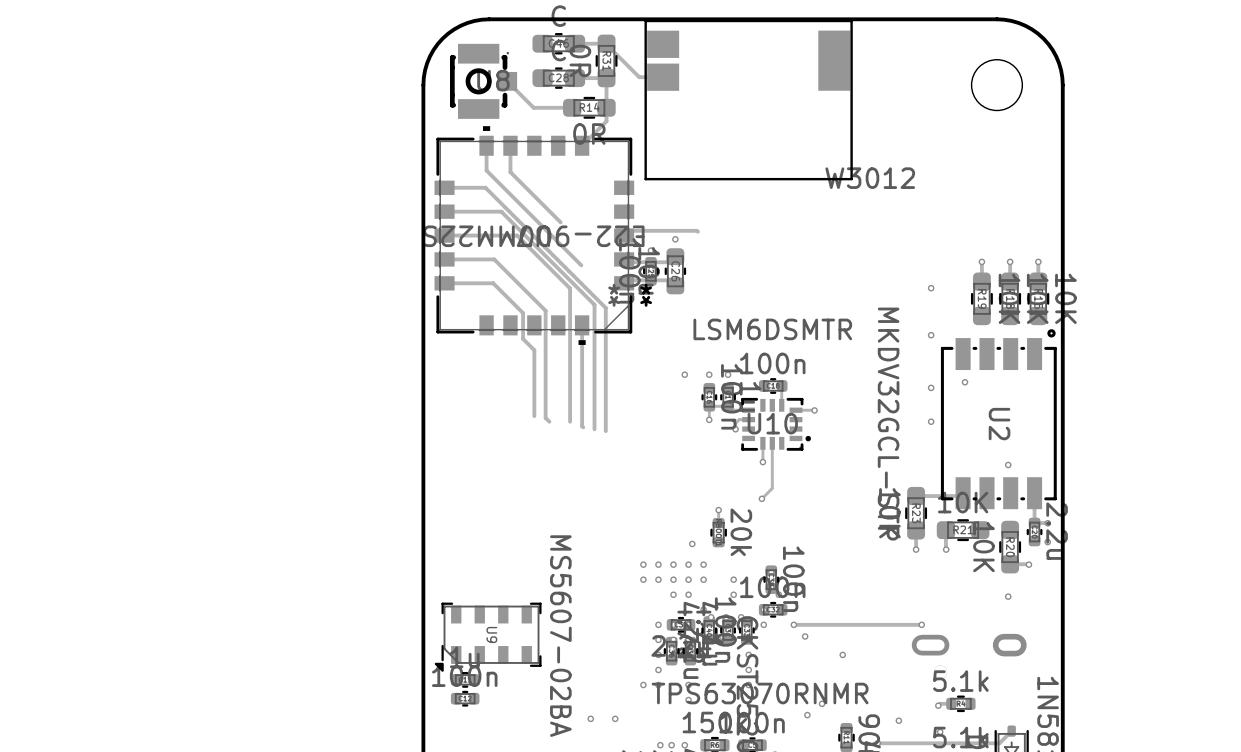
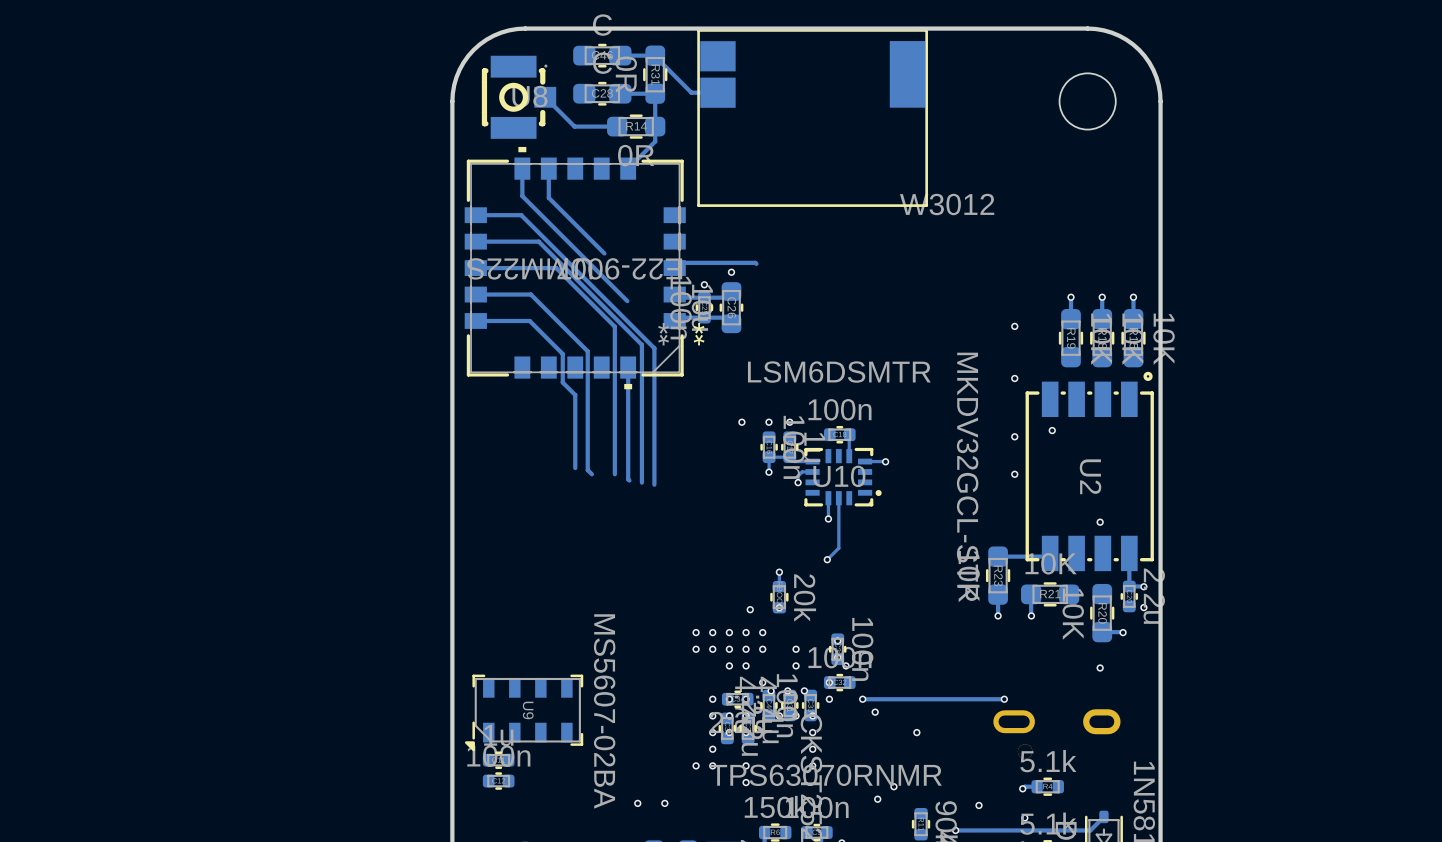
via: (660, 745) -> none
via: (671, 745) -> none
via: (684, 745) -> none

